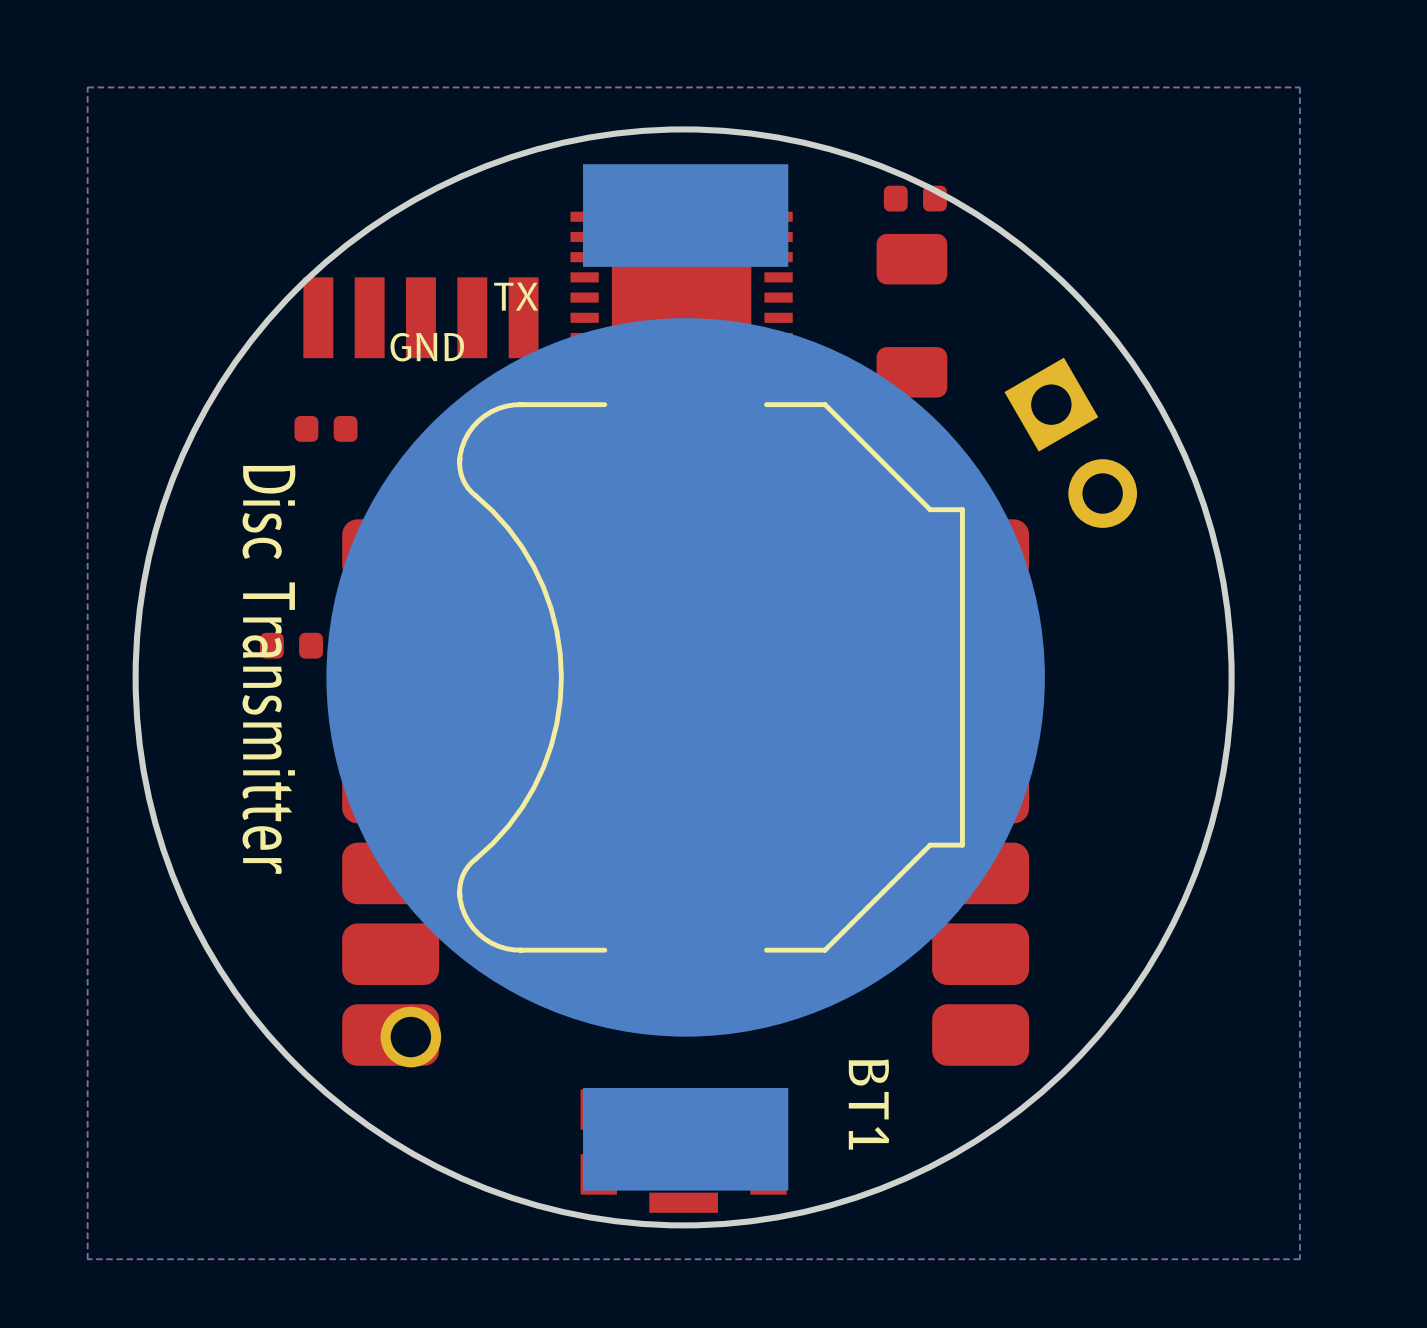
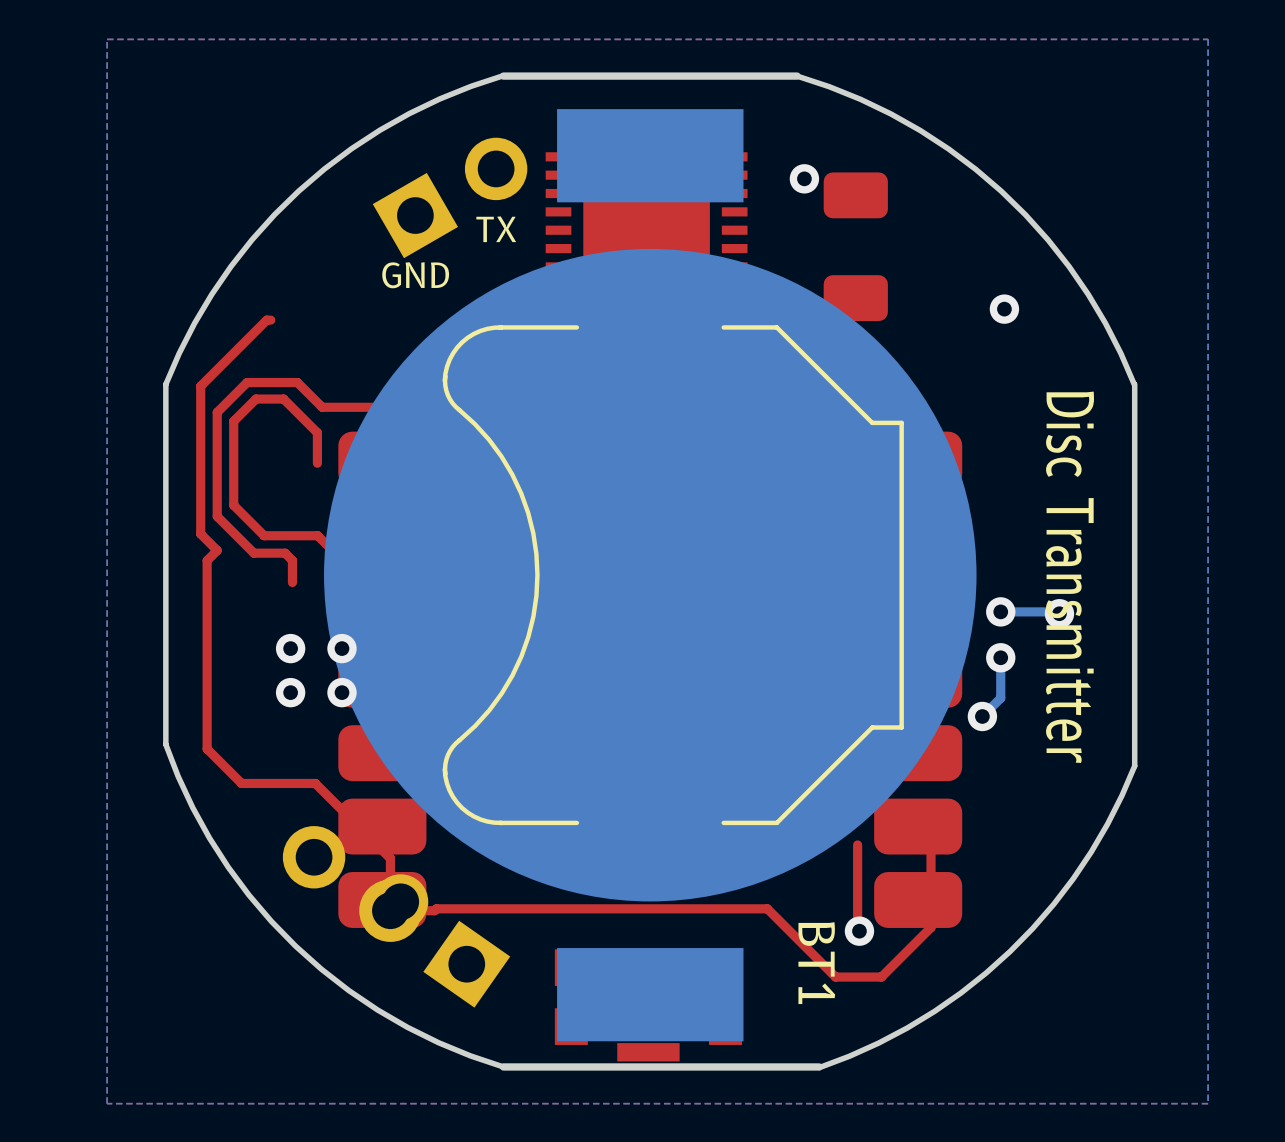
round board edge: [132, 126, 1235, 1229] -> none
board edge: none -> (503, 75) (471, 86) (409, 113) (351, 148) (298, 190) (274, 214) (231, 266) (211, 294) (179, 353) (165, 384) (165, 744)
board edge: none -> (503, 76) (797, 76) (829, 86) (890, 113) (948, 149) (975, 169) (1025, 214) (1069, 266) (1088, 294) (1105, 323) (1134, 384)
part: (915, 198) -> none
via: none -> (804, 178)
part: (420, 317) -> none
via: none -> (1004, 309)
top track: none -> (270, 320) (266, 320) (200, 386) (200, 533) (217, 550) (207, 560) (207, 748) (241, 783) (315, 783) (390, 858) (390, 910) (434, 910) (436, 908) (767, 908) (835, 977) (881, 977) (931, 927) (931, 844)
part: (326, 428) -> none
part rotation: 0° (1070, 442) -> 90° counterclockwise (450, 197)
part position: (1070, 442) -> (450, 197)
board edge: none -> (1134, 384) (1134, 766) (1122, 795) (1091, 852) (1073, 878) (1032, 928) (986, 972) (934, 1011) (907, 1028) (878, 1043) (819, 1067)
top track: none -> (317, 463) (317, 432) (283, 399) (255, 399) (233, 421) (233, 505) (264, 535) (317, 535) (347, 565) (347, 582)
top track: none -> (457, 463) (457, 432) (431, 407) (322, 407) (297, 382) (247, 382) (217, 412) (217, 516) (253, 553) (285, 553) (292, 560) (292, 582)
part: (291, 645) -> none
text position: Disc Transmitter (268, 669) -> Disc Transmitter (1070, 577)
bottom track: none -> (1000, 611) (1057, 611) (1059, 613)
via: none -> (1000, 611)
via: none -> (1059, 613)
via: none -> (290, 648)
via: none -> (342, 648)
bottom track: none -> (1000, 657) (1000, 698) (982, 716)
via: none -> (1000, 657)
via: none -> (290, 692)
via: none -> (342, 692)
via: none -> (982, 716)
board edge: none -> (165, 744) (192, 807) (209, 838) (228, 867) (271, 921) (321, 969) (348, 990) (407, 1027) (470, 1055) (503, 1066) (819, 1066)
top track: none -> (857, 844) (857, 929) (859, 931)
part: none -> (396, 916)
via: none -> (859, 931)

